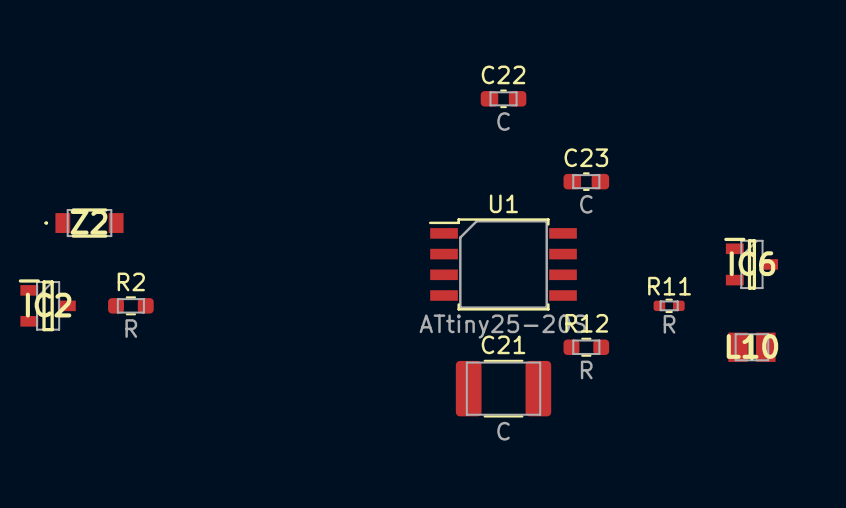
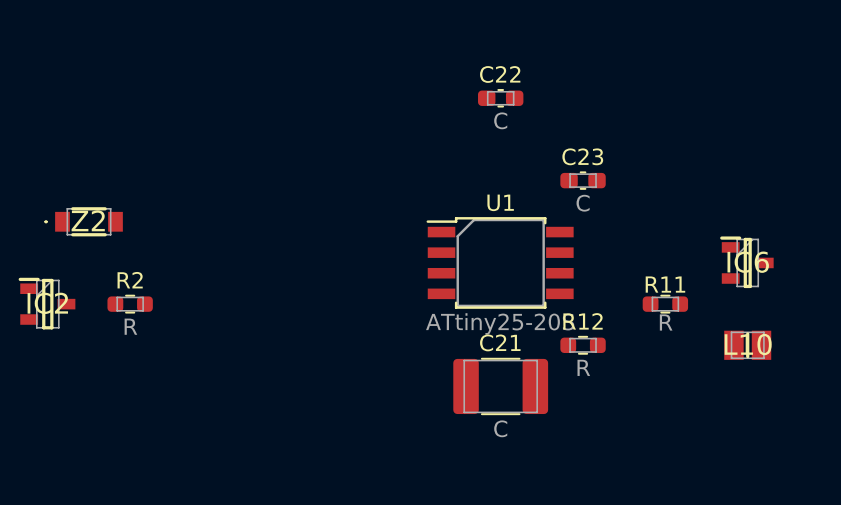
R11 footprint: [653, 298, 685, 314] -> [642, 294, 689, 314]

